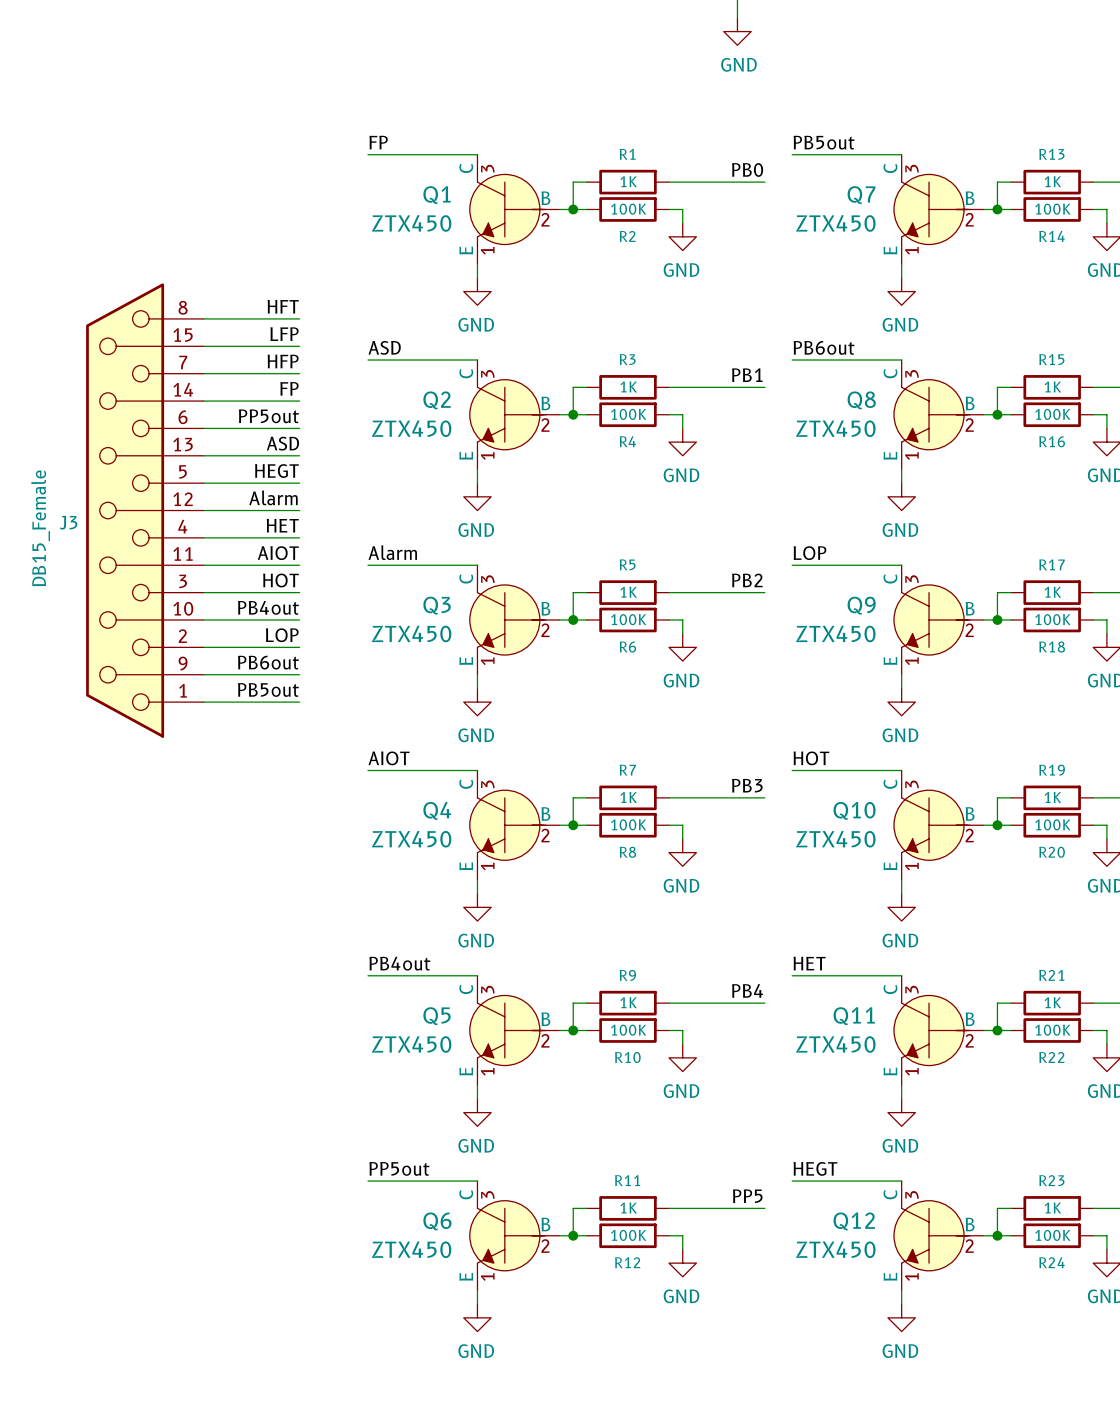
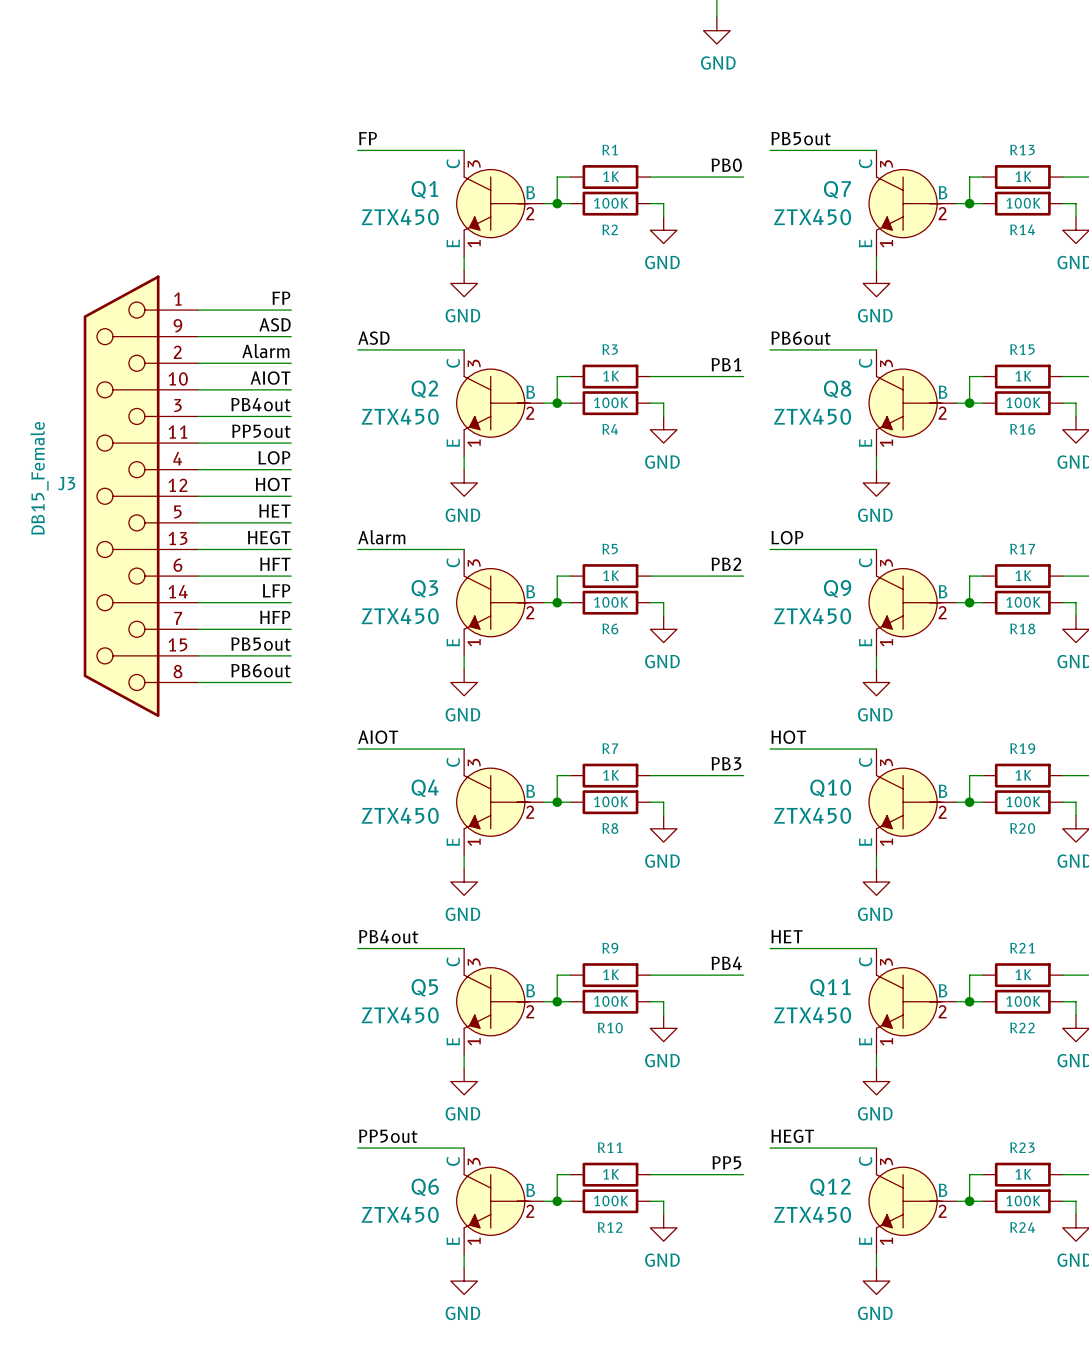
label: HFT (283, 306) -> FP (281, 298)
label: LFP (284, 334) -> ASD (275, 324)
label: HFP (283, 361) -> Alarm (265, 351)
label: FP (289, 388) -> AIOT (270, 378)
label: PP5out (268, 416) -> PB4out (260, 404)
label: ASD (282, 443) -> PP5out (261, 431)
label: HEGT (276, 471) -> LOP (274, 457)
label: Alarm (273, 497) -> HOT (273, 484)
J3 flip: as is (125, 510) -> up-down (121, 496)
label: AIOT (278, 553) -> HEGT (269, 537)
label: HOT (280, 580) -> HFT (275, 564)
label: PB4out (268, 607) -> LFP (276, 590)
label: LOP (282, 635) -> HFP (275, 617)
label: PB6out (268, 662) -> PB5out (260, 644)
label: PB5out (268, 689) -> PB6out (260, 670)

